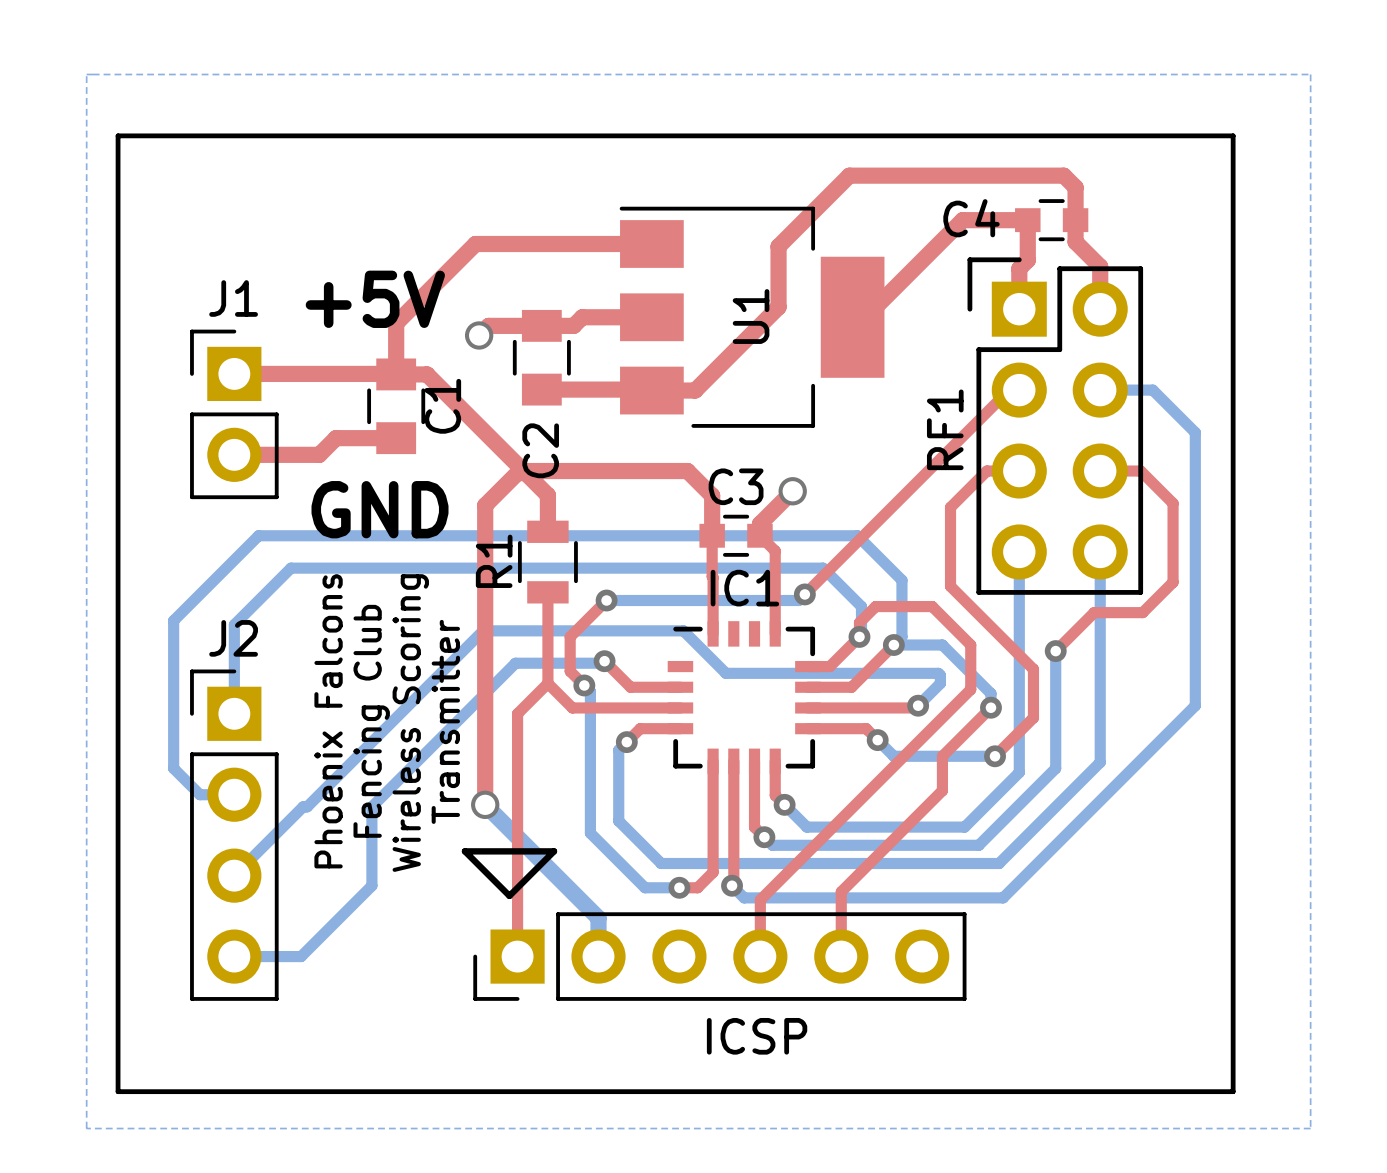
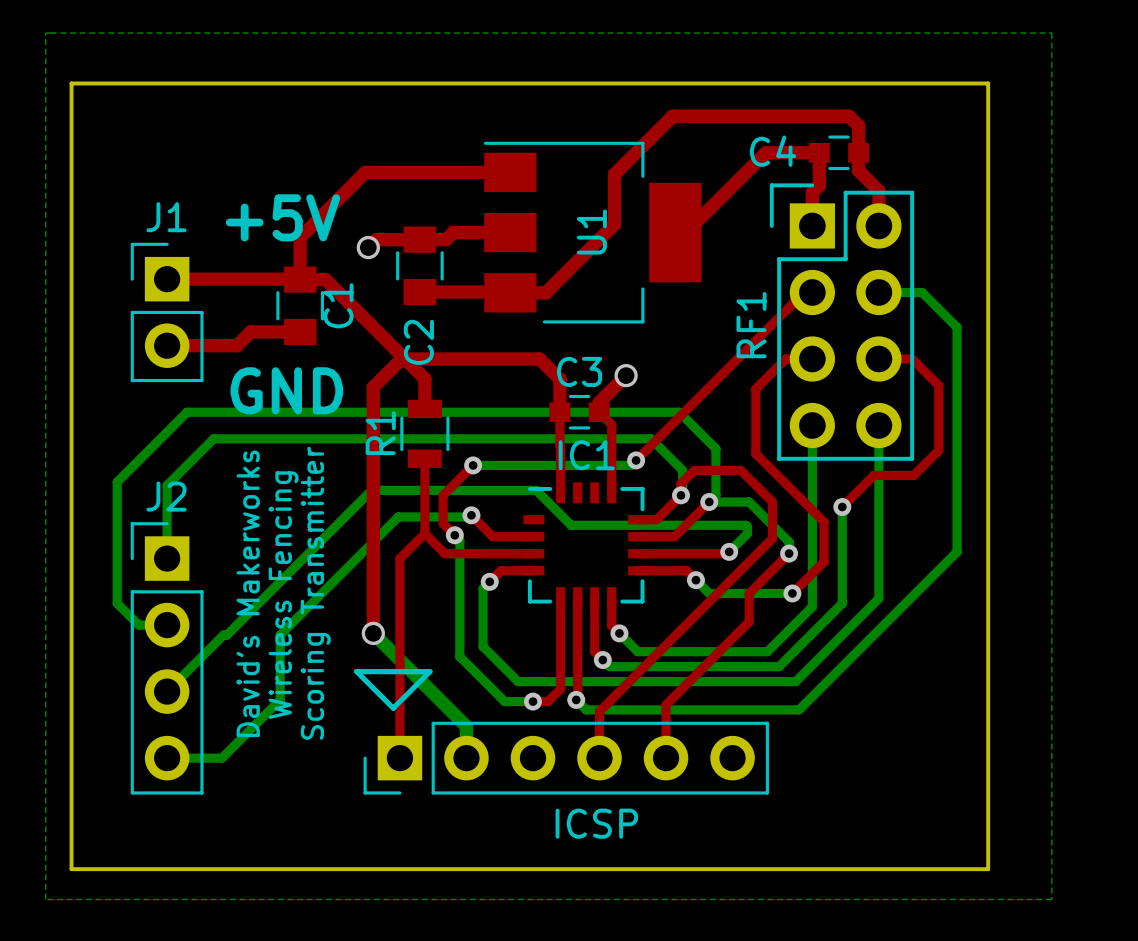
text: Phoenix Falcons (328, 721) -> none
text: Fencing Club (371, 721) -> none
text: Transmitter (445, 721) -> Scoring Transmitter (315, 593)
text: Wireless Scoring (410, 723) -> Wireless Fencing (283, 595)
text: none -> David's Makerworks (248, 593)

